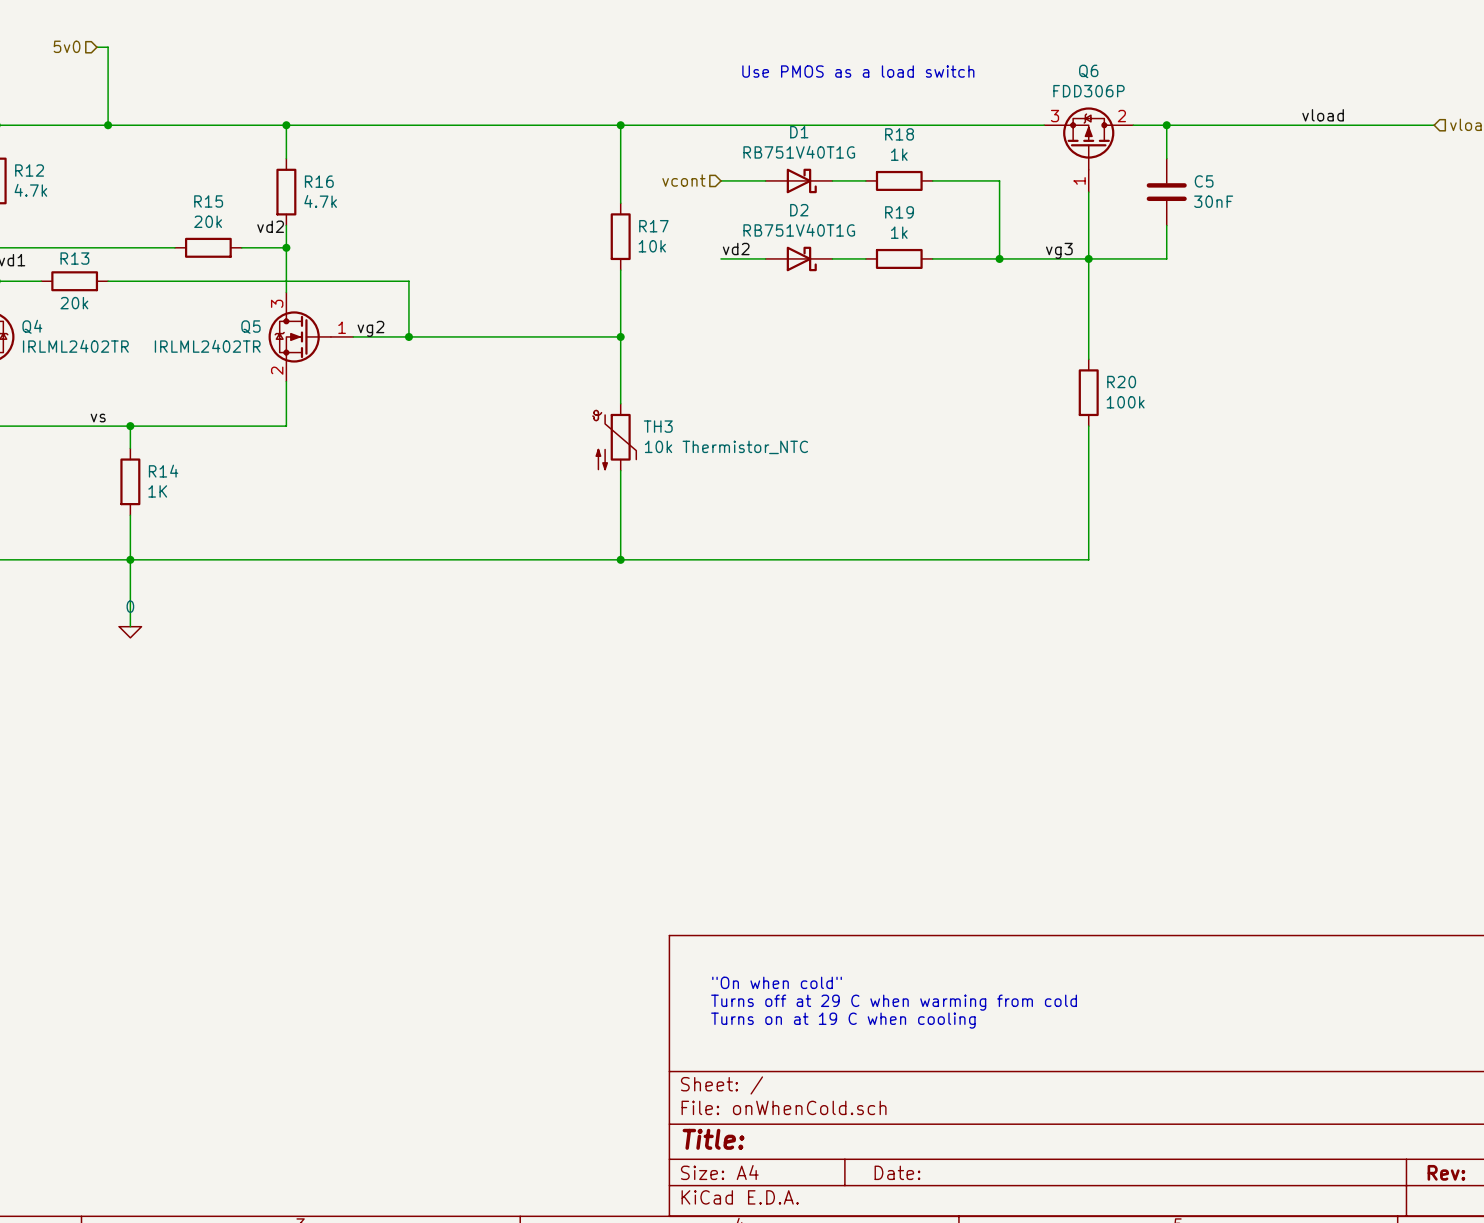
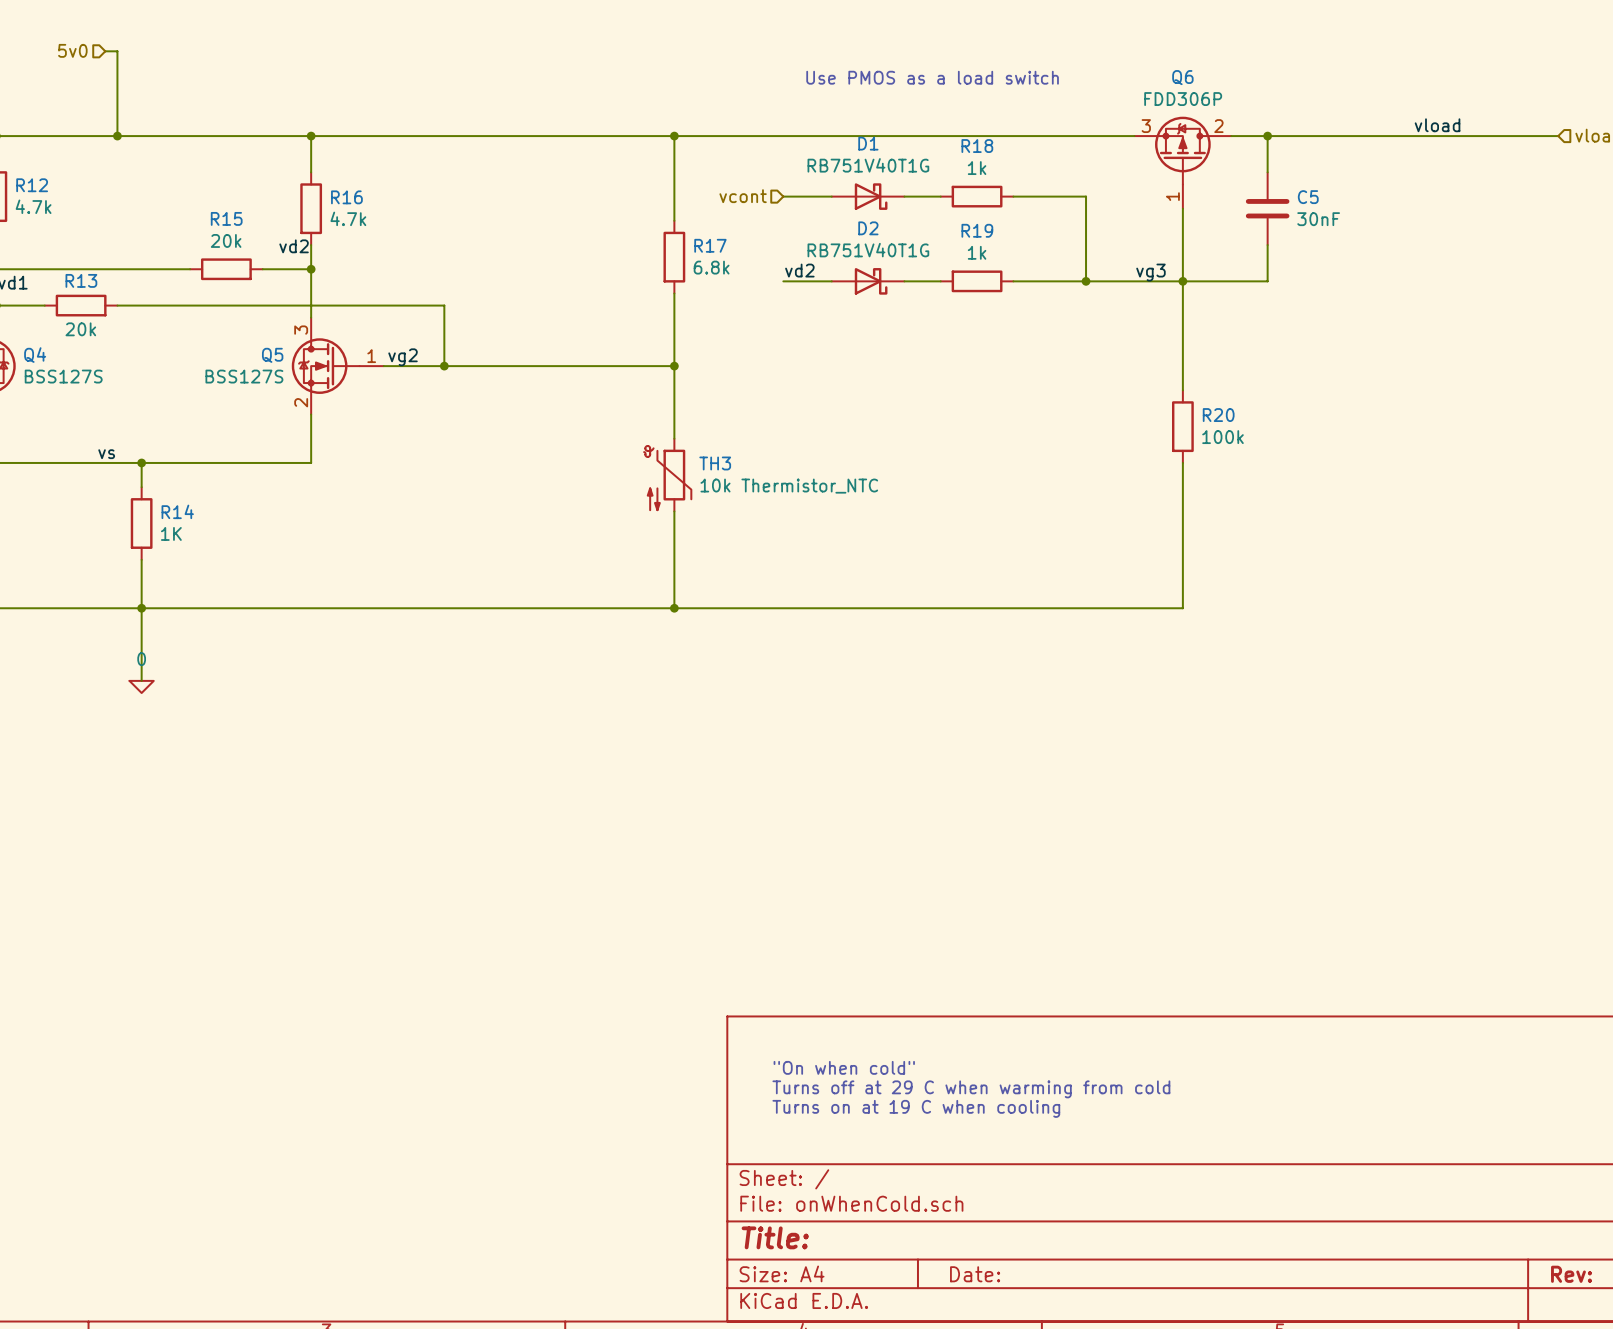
R17 value: 10k (652, 246) -> 6.8k (711, 267)
Q4 value: IRLML2402TR (75, 346) -> BSS127S (63, 376)
Q5 value: IRLML2402TR (207, 346) -> BSS127S (244, 376)

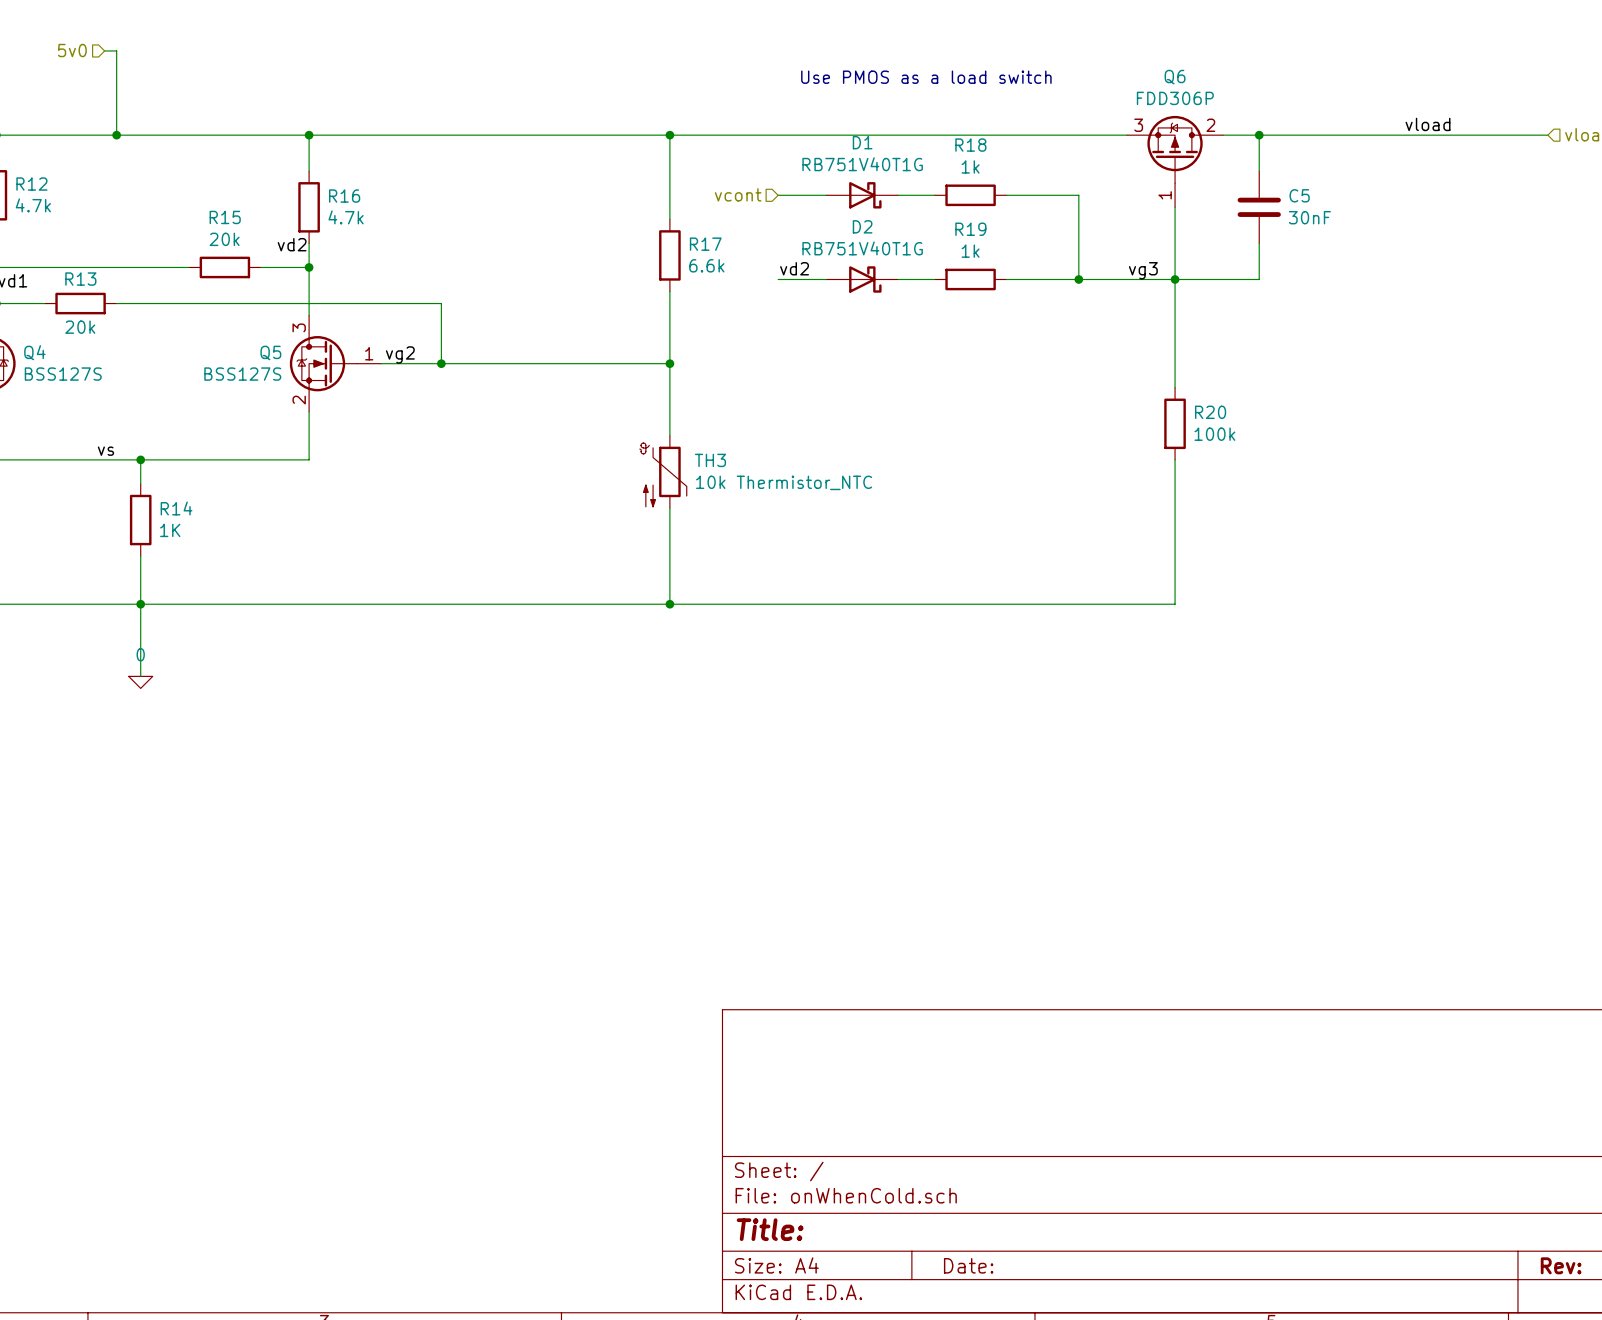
R17 value: 6.8k (711, 267) -> 6.6k (706, 265)
text: "On when cold" (844, 1067) -> none
text: Turns off at 29 C when warming from cold (971, 1089) -> none
text: Turns on at 19 C when cooling (916, 1108) -> none

